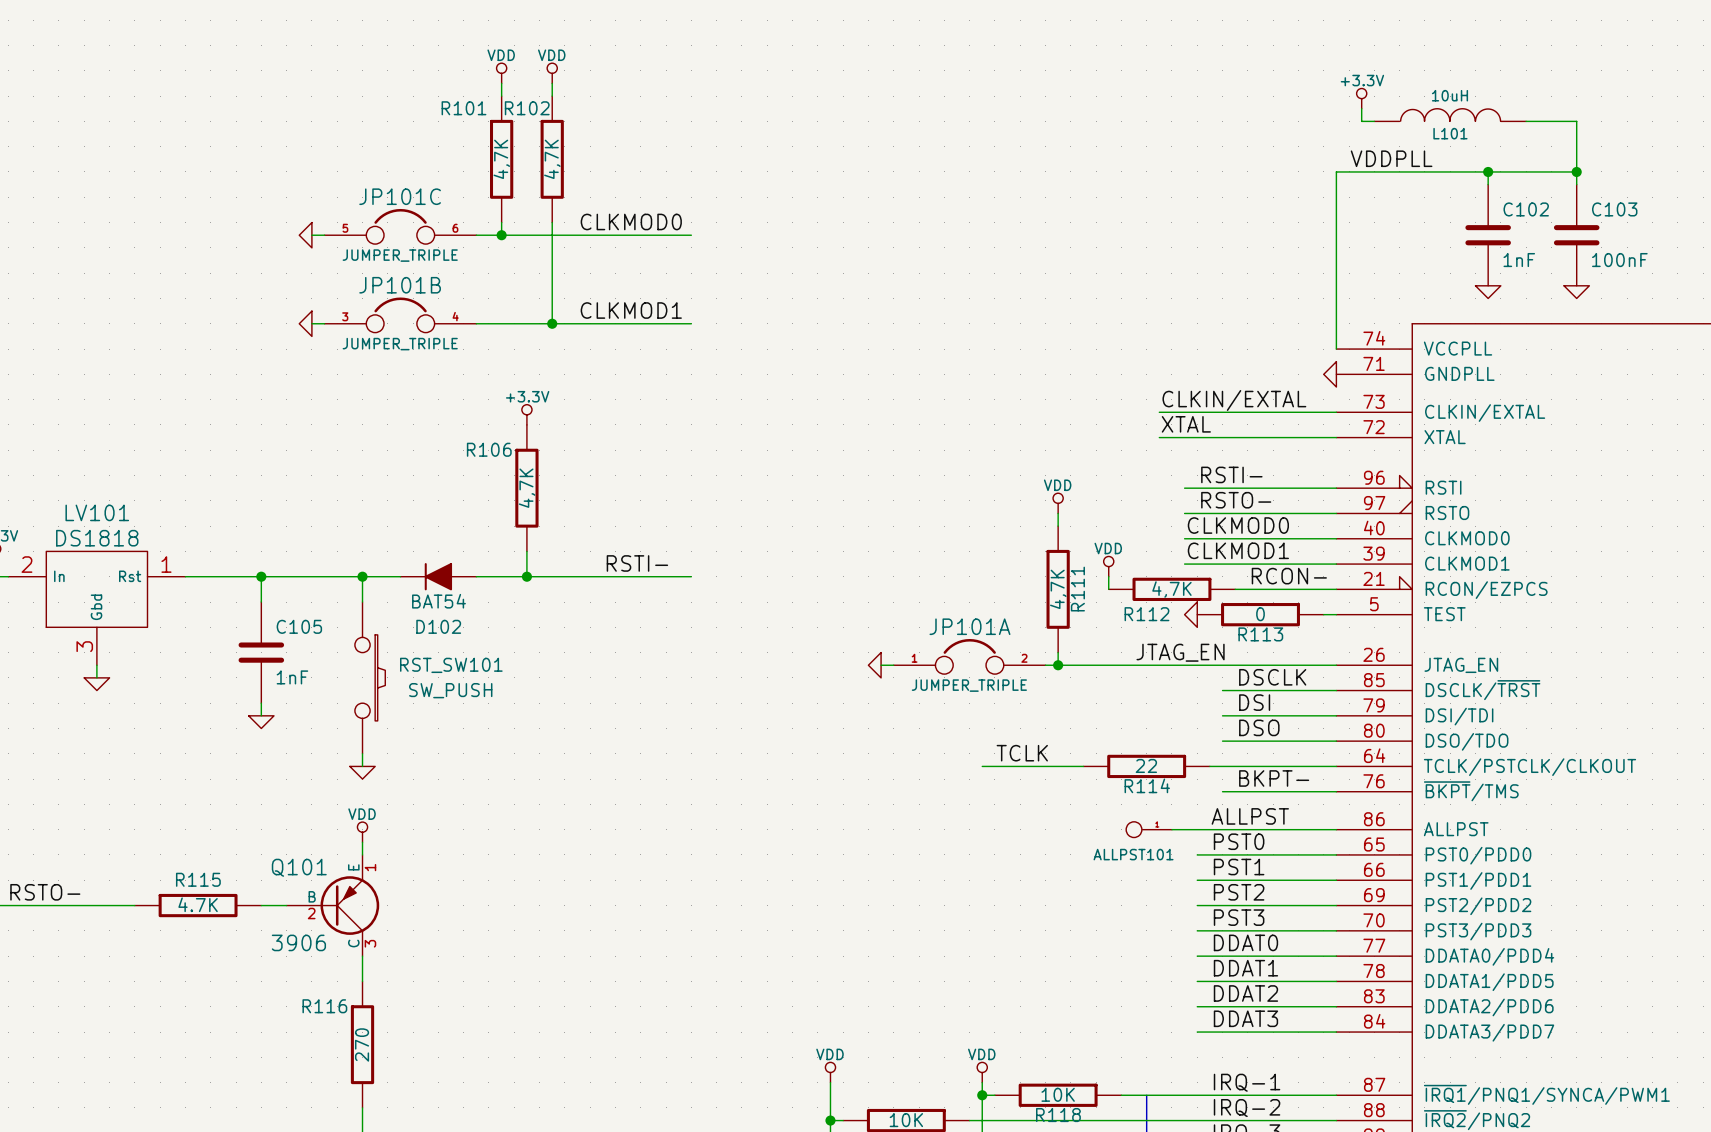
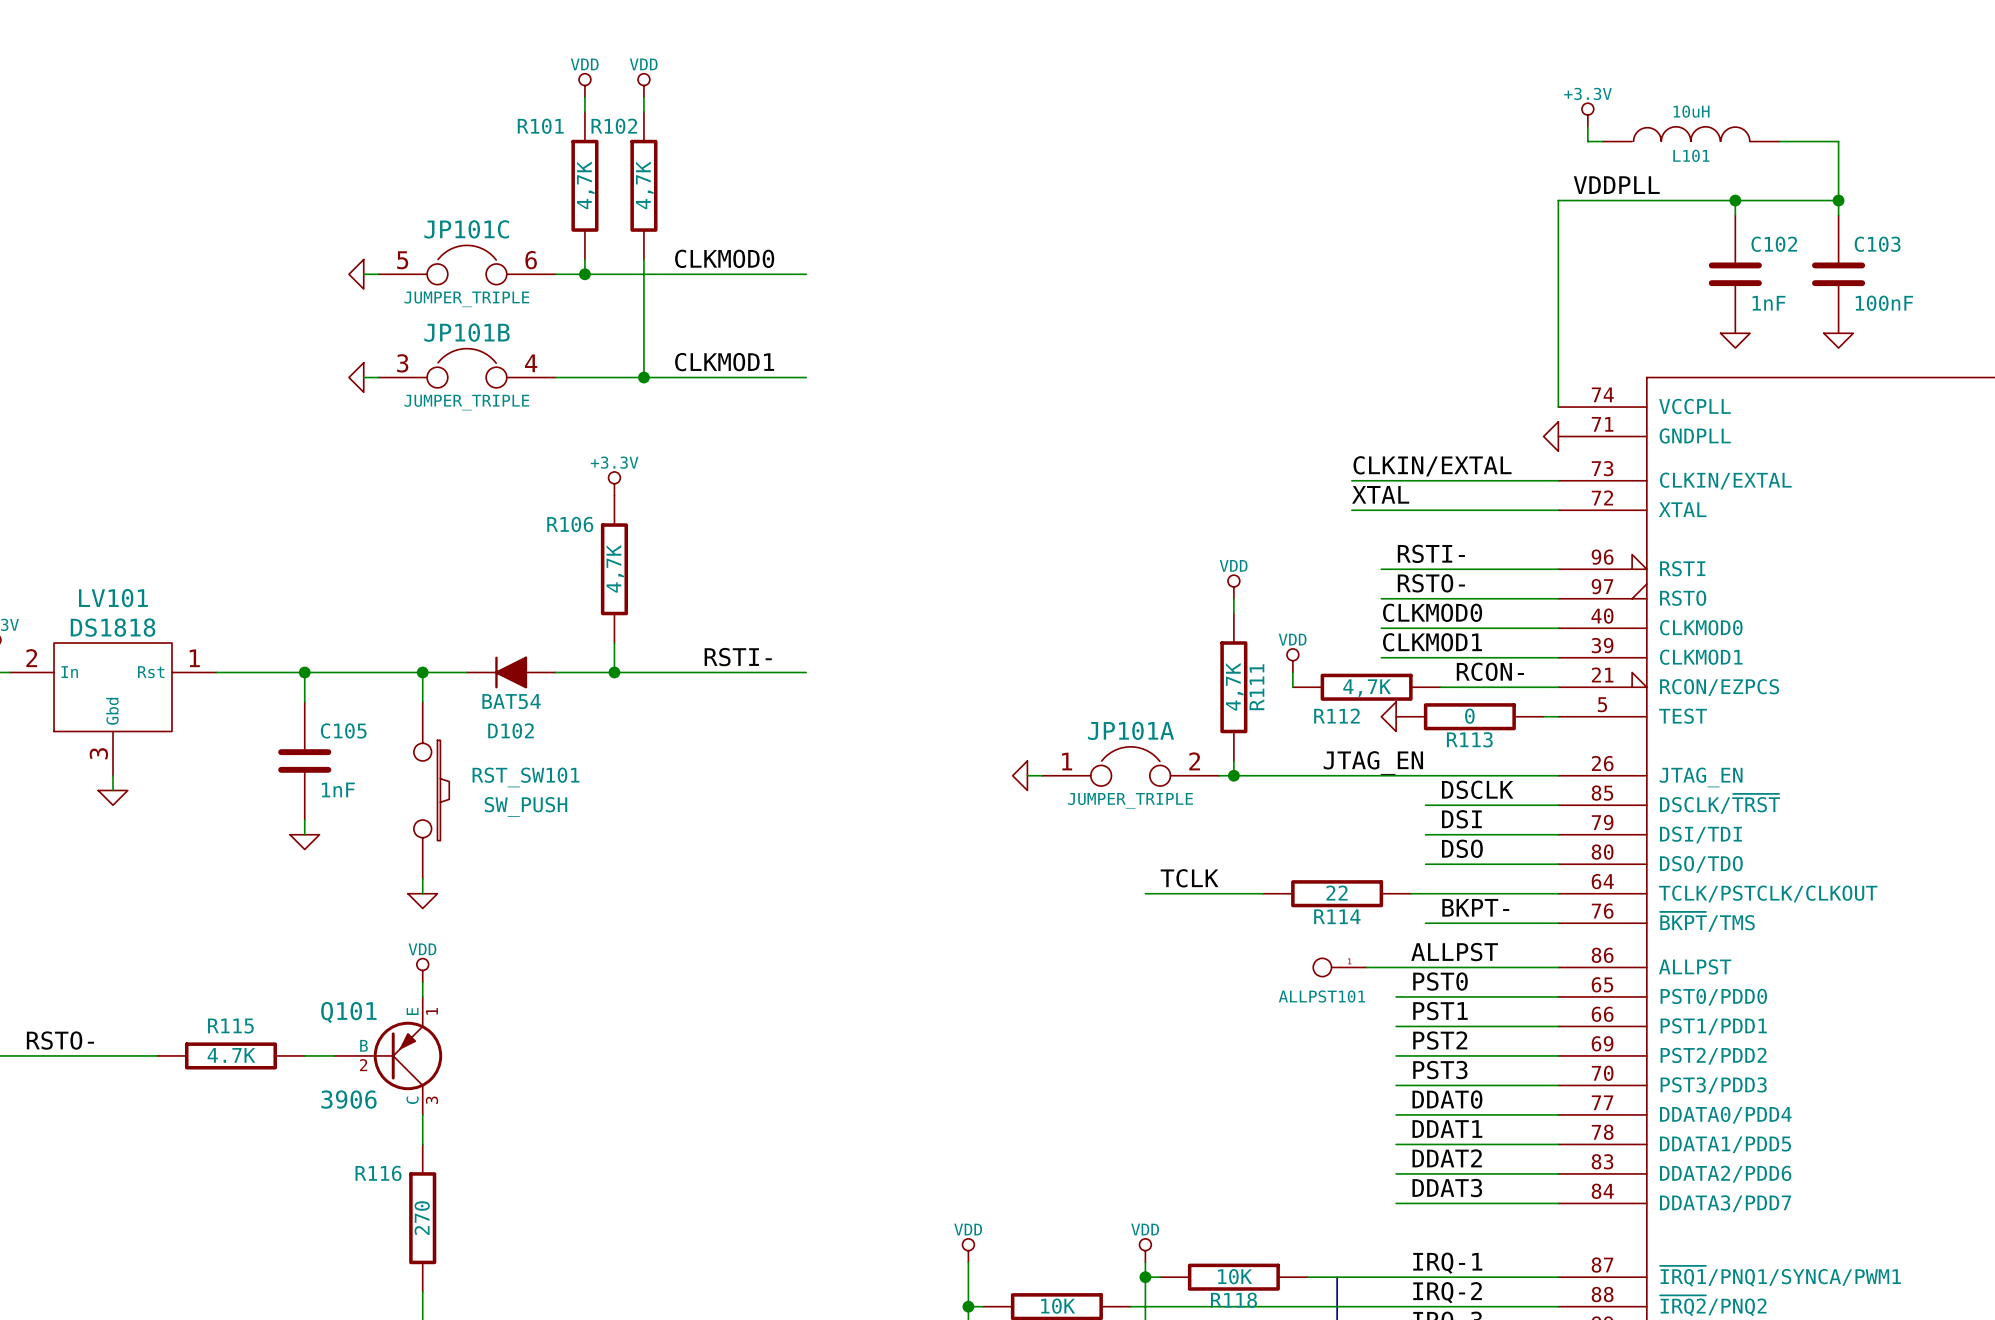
JP101C symbol: [324, 208, 477, 245] -> [378, 245, 556, 285]
JP101B symbol: [324, 297, 477, 333] -> [378, 348, 556, 388]
JP101A symbol: [893, 638, 1046, 675] -> [1042, 746, 1220, 787]

